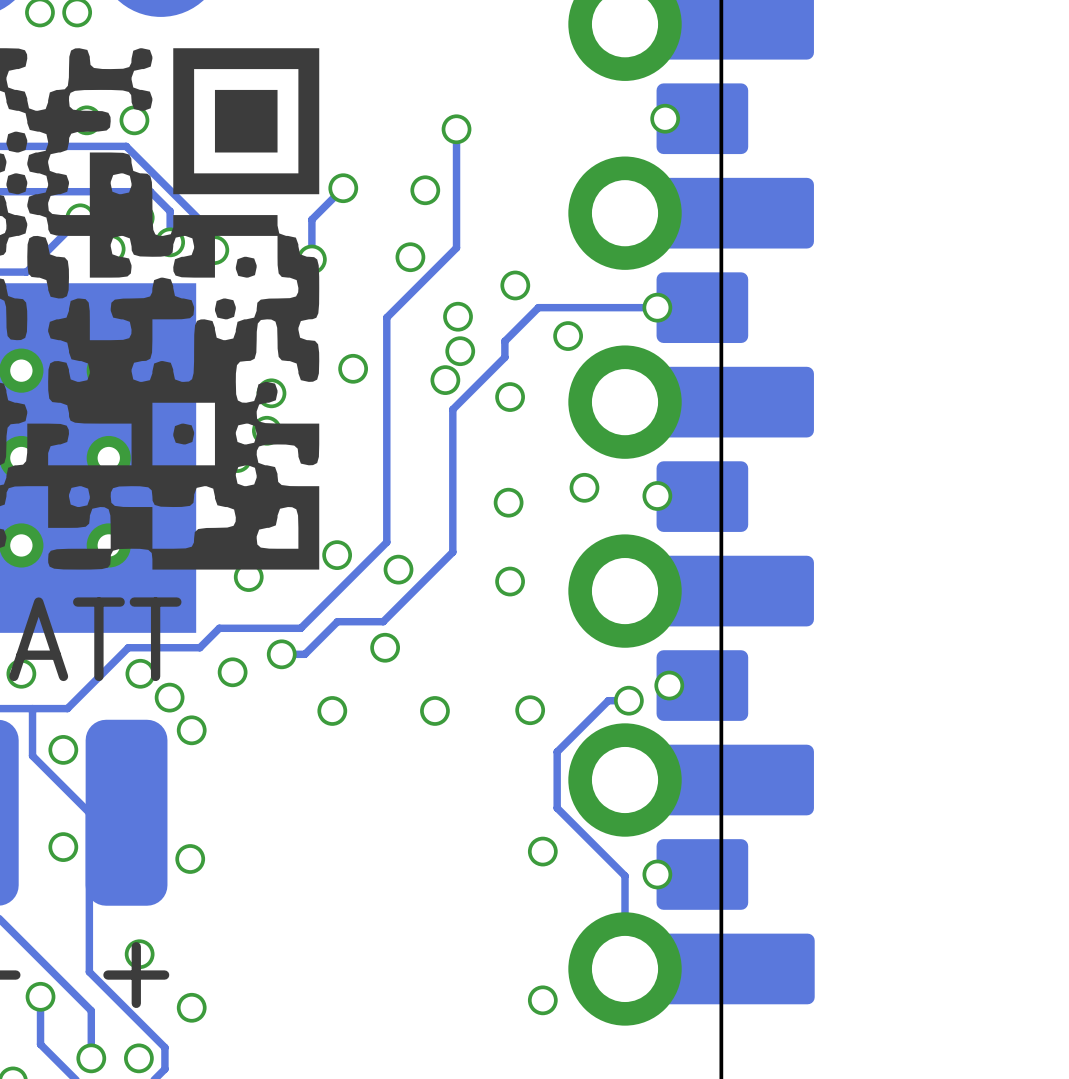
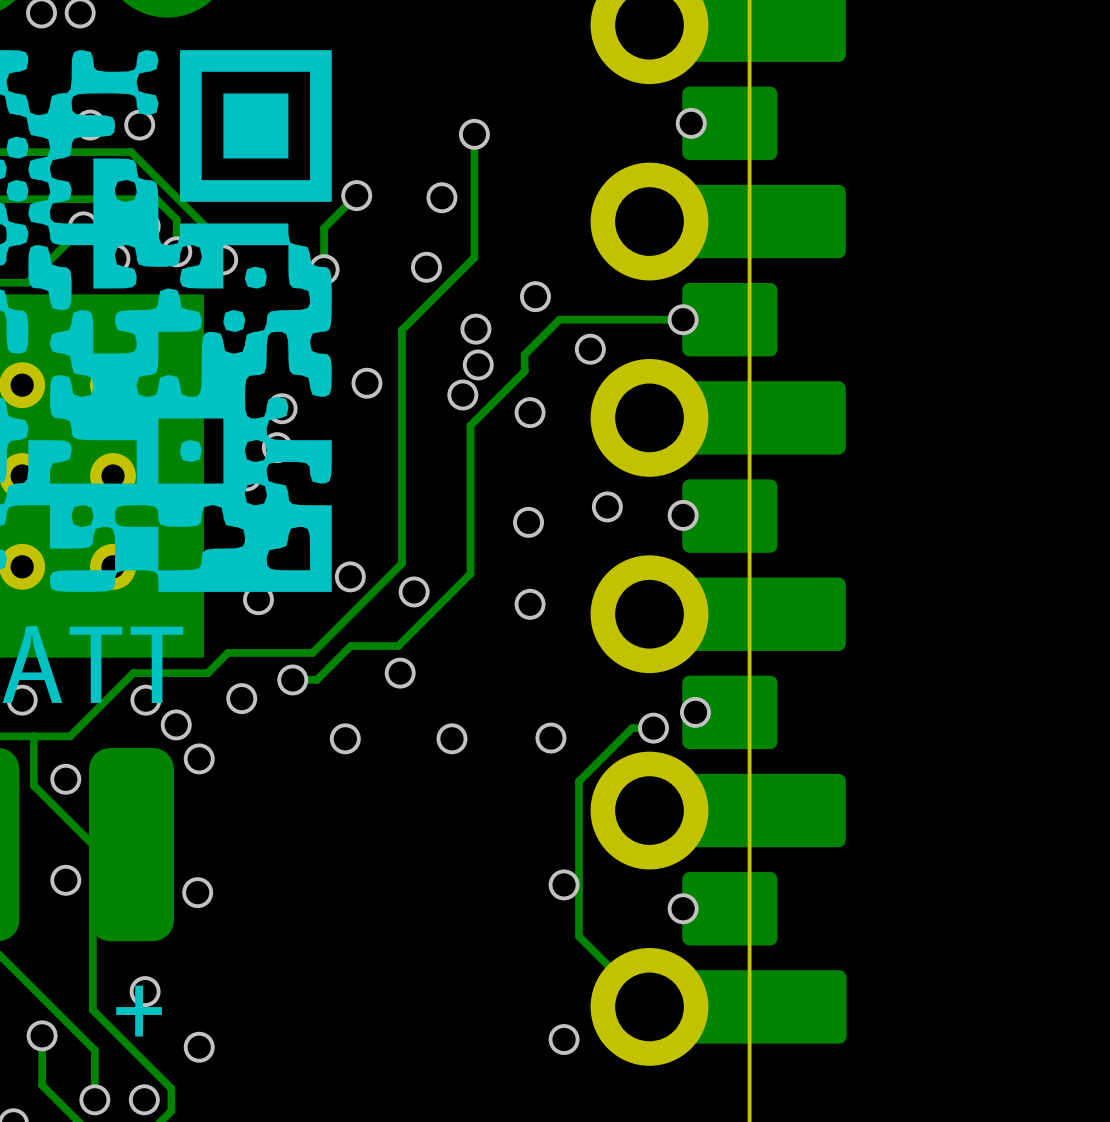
track: (557, 808) (625, 875) (625, 968) -> (579, 839) (579, 936) (649, 1006)

